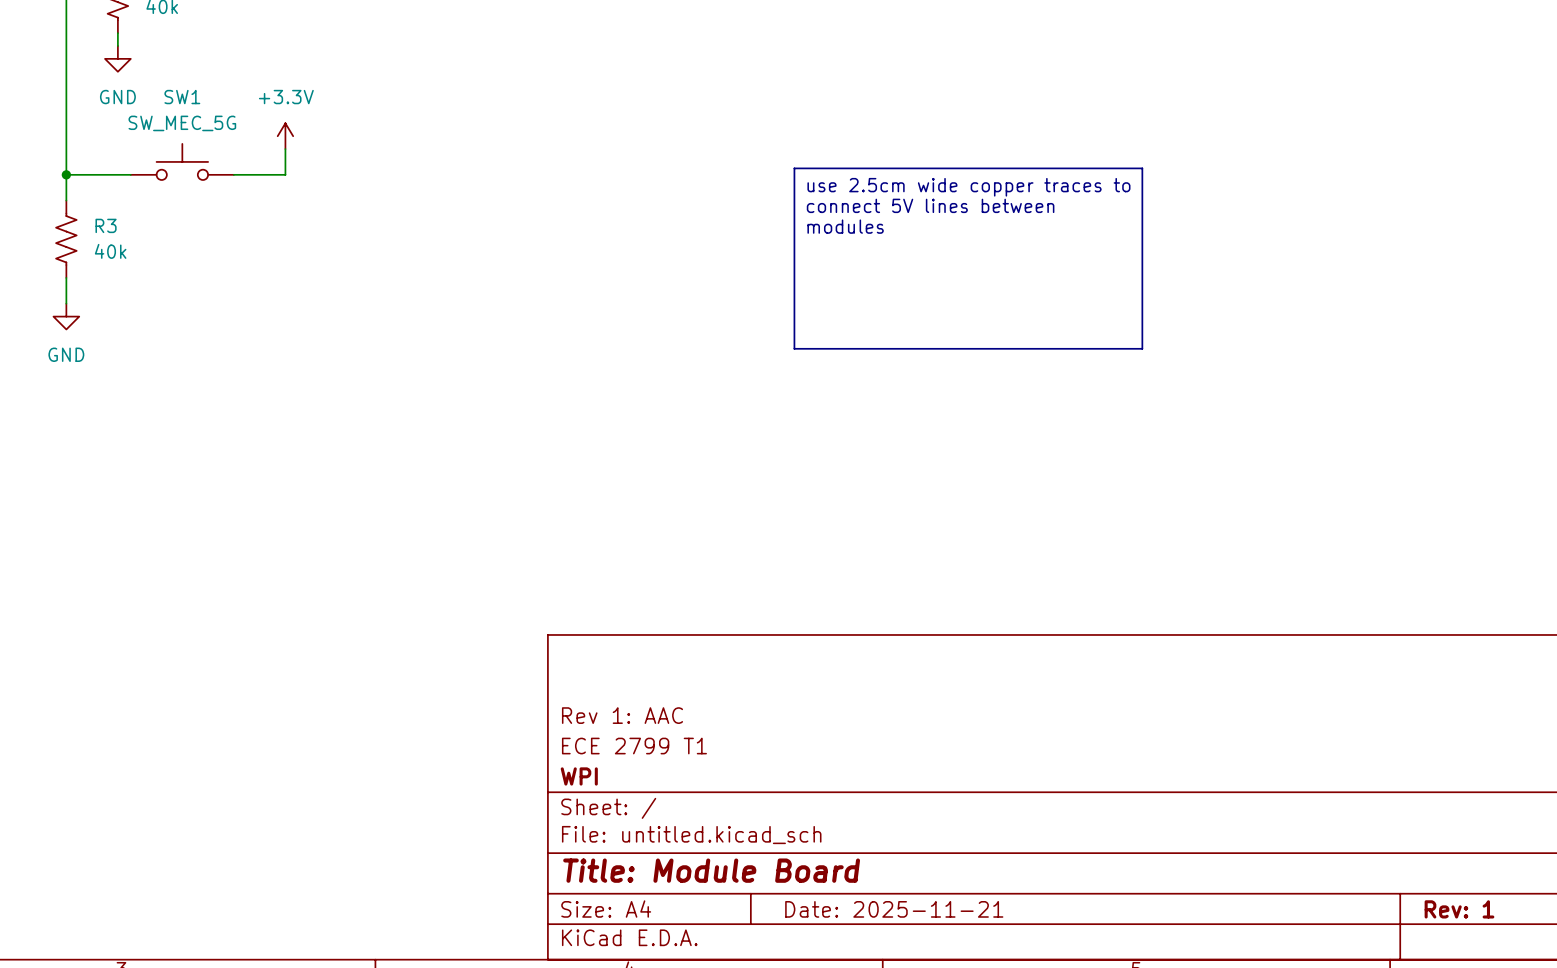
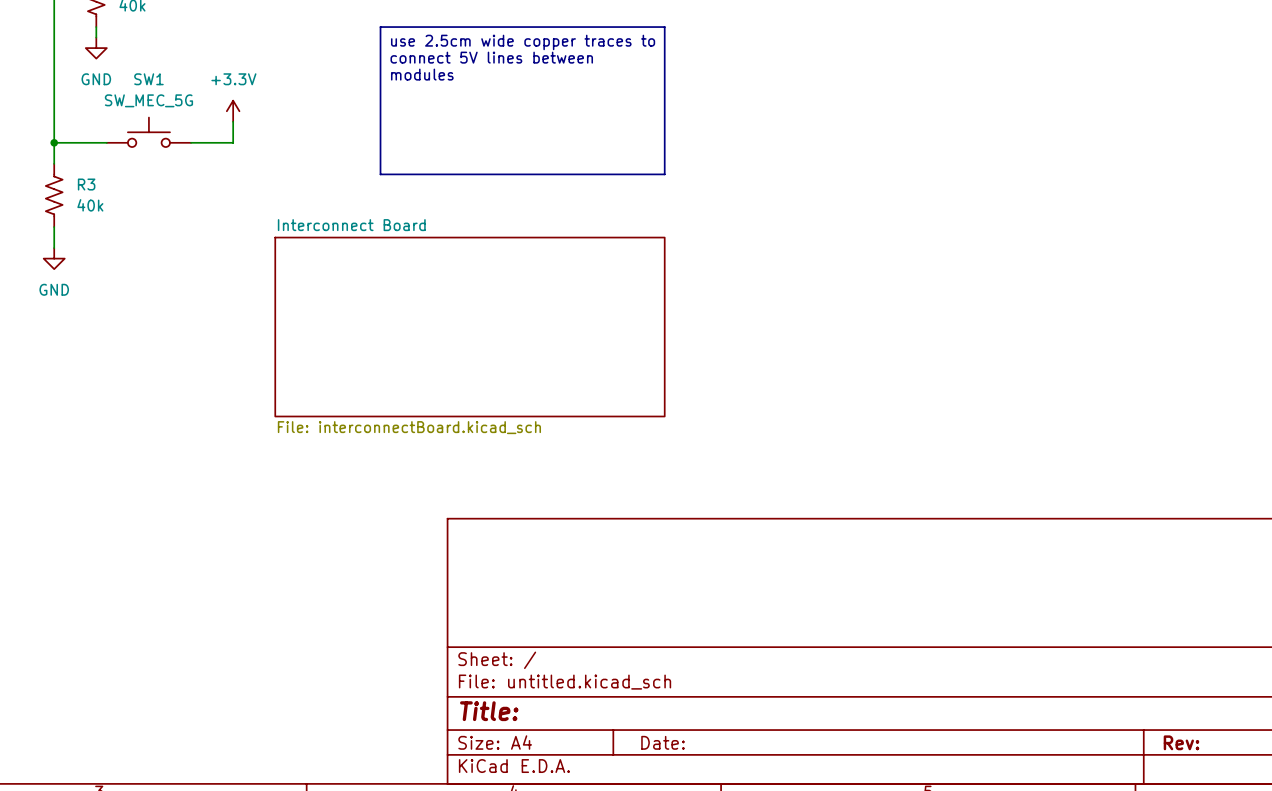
line: none -> (380, 27) (664, 27) (664, 174) (380, 174) (380, 27)
text: none -> use 2.5cm wide copper traces to (523, 42)
text: none -> connect 5V lines between (491, 57)
text: none -> modules (422, 74)
line: (794, 168) (1142, 168) (1142, 348) (794, 348) (794, 168) -> none
text: use 2.5cm wide copper traces to (968, 187) -> none
text: connect 5V lines between (930, 205) -> none
text: modules (845, 226) -> none
sheet Interconnect Board: none -> File: interconnectBoard.kicad_sch (469, 327)
title block: Rev 1: AAC (622, 715) -> none
title block: ECE 2799 T1 (634, 746) -> none
title block: WPI (579, 776) -> none
title block: Title: Module Board (711, 870) -> Title: (489, 711)
title block: Date: 2025-11-21 (894, 909) -> Date: (662, 742)
title block: Rev: 1 (1459, 909) -> Rev: (1181, 742)

